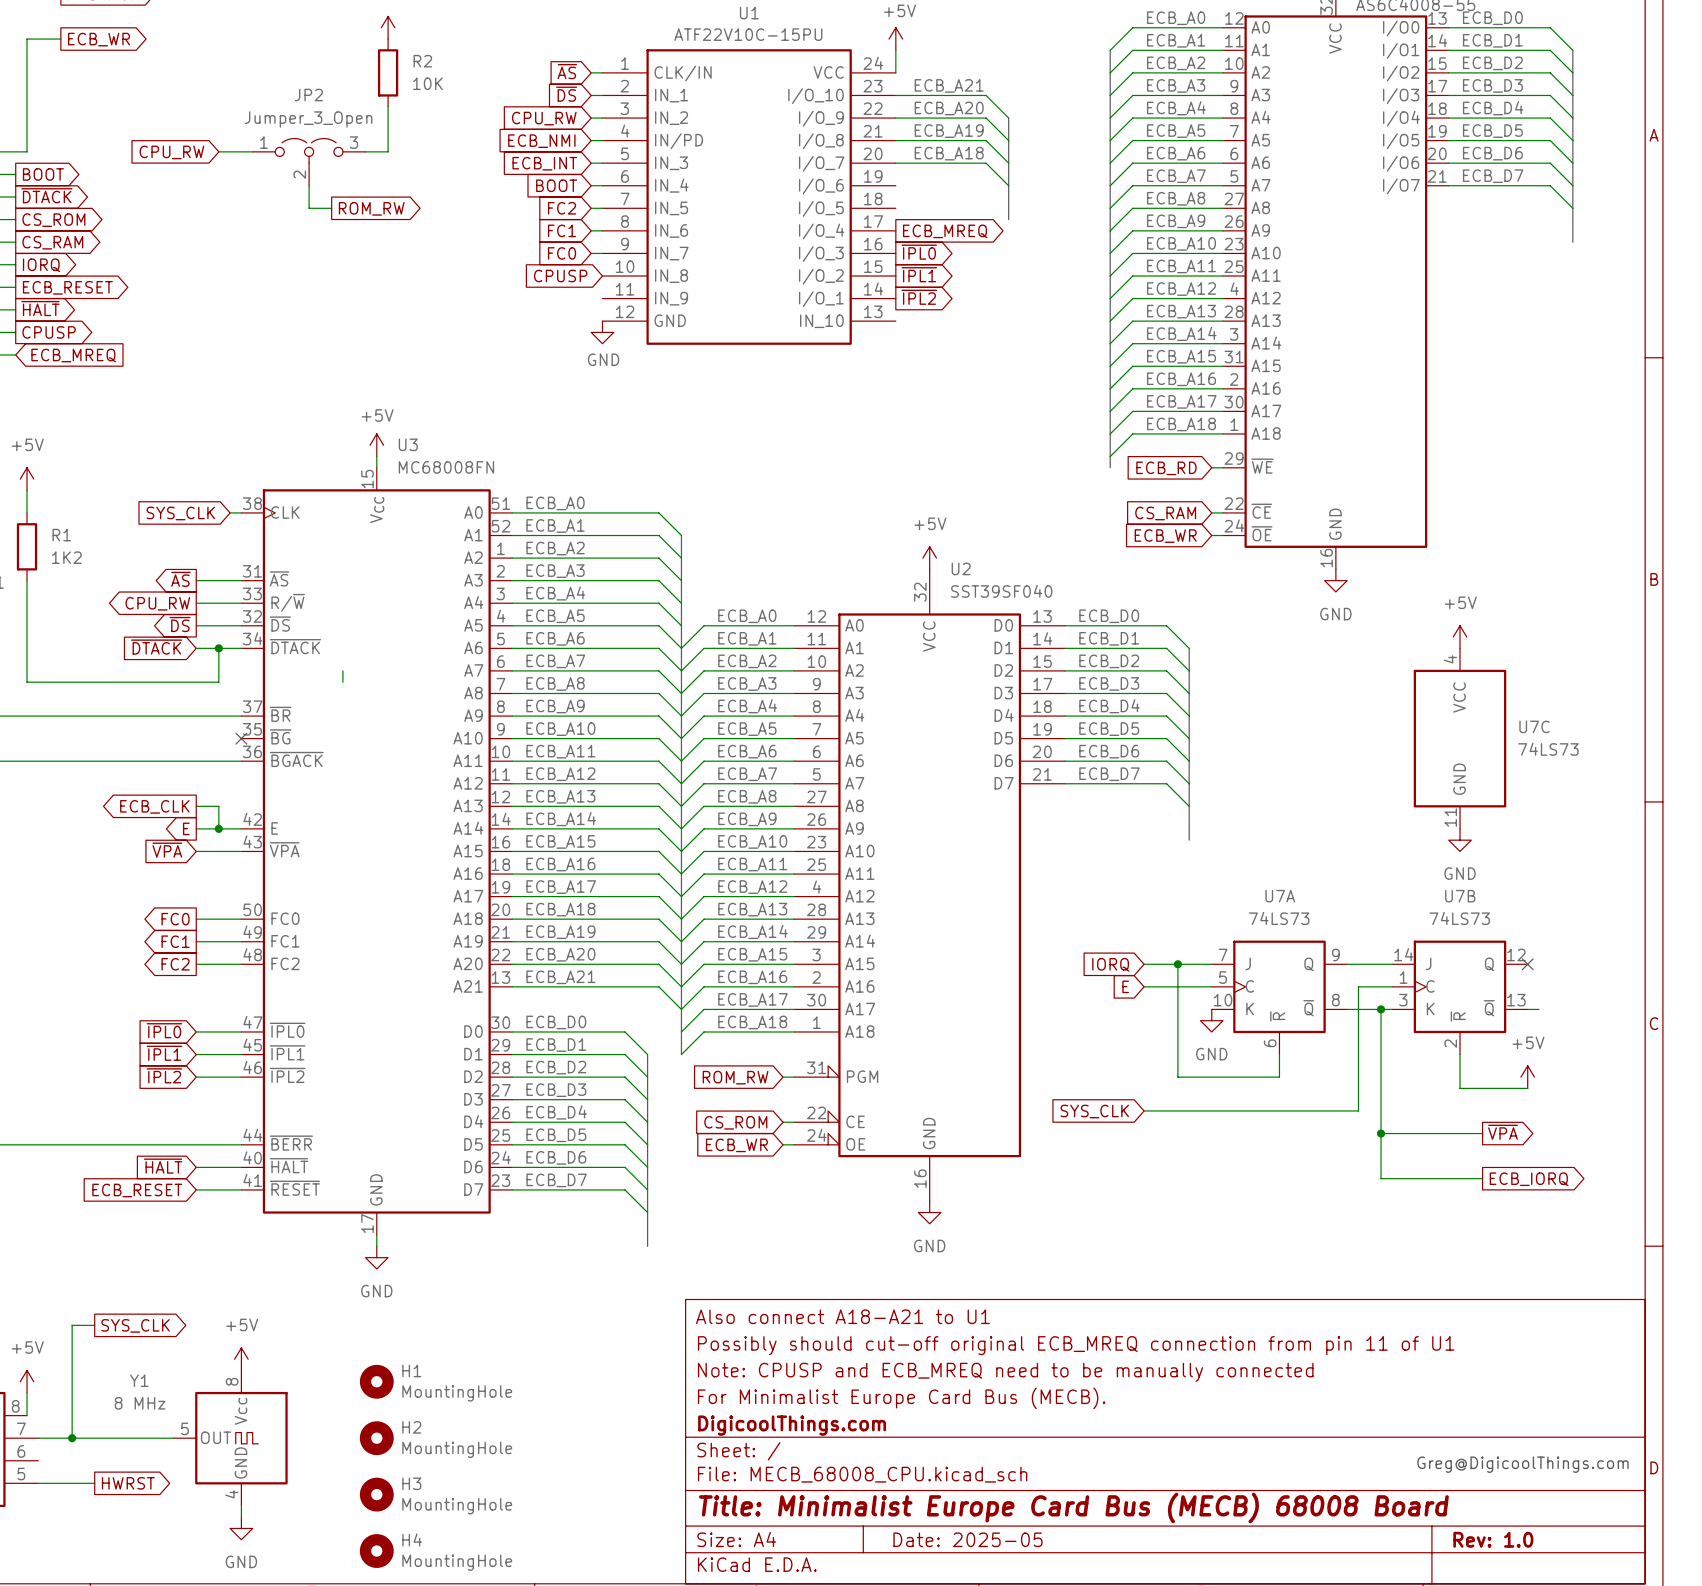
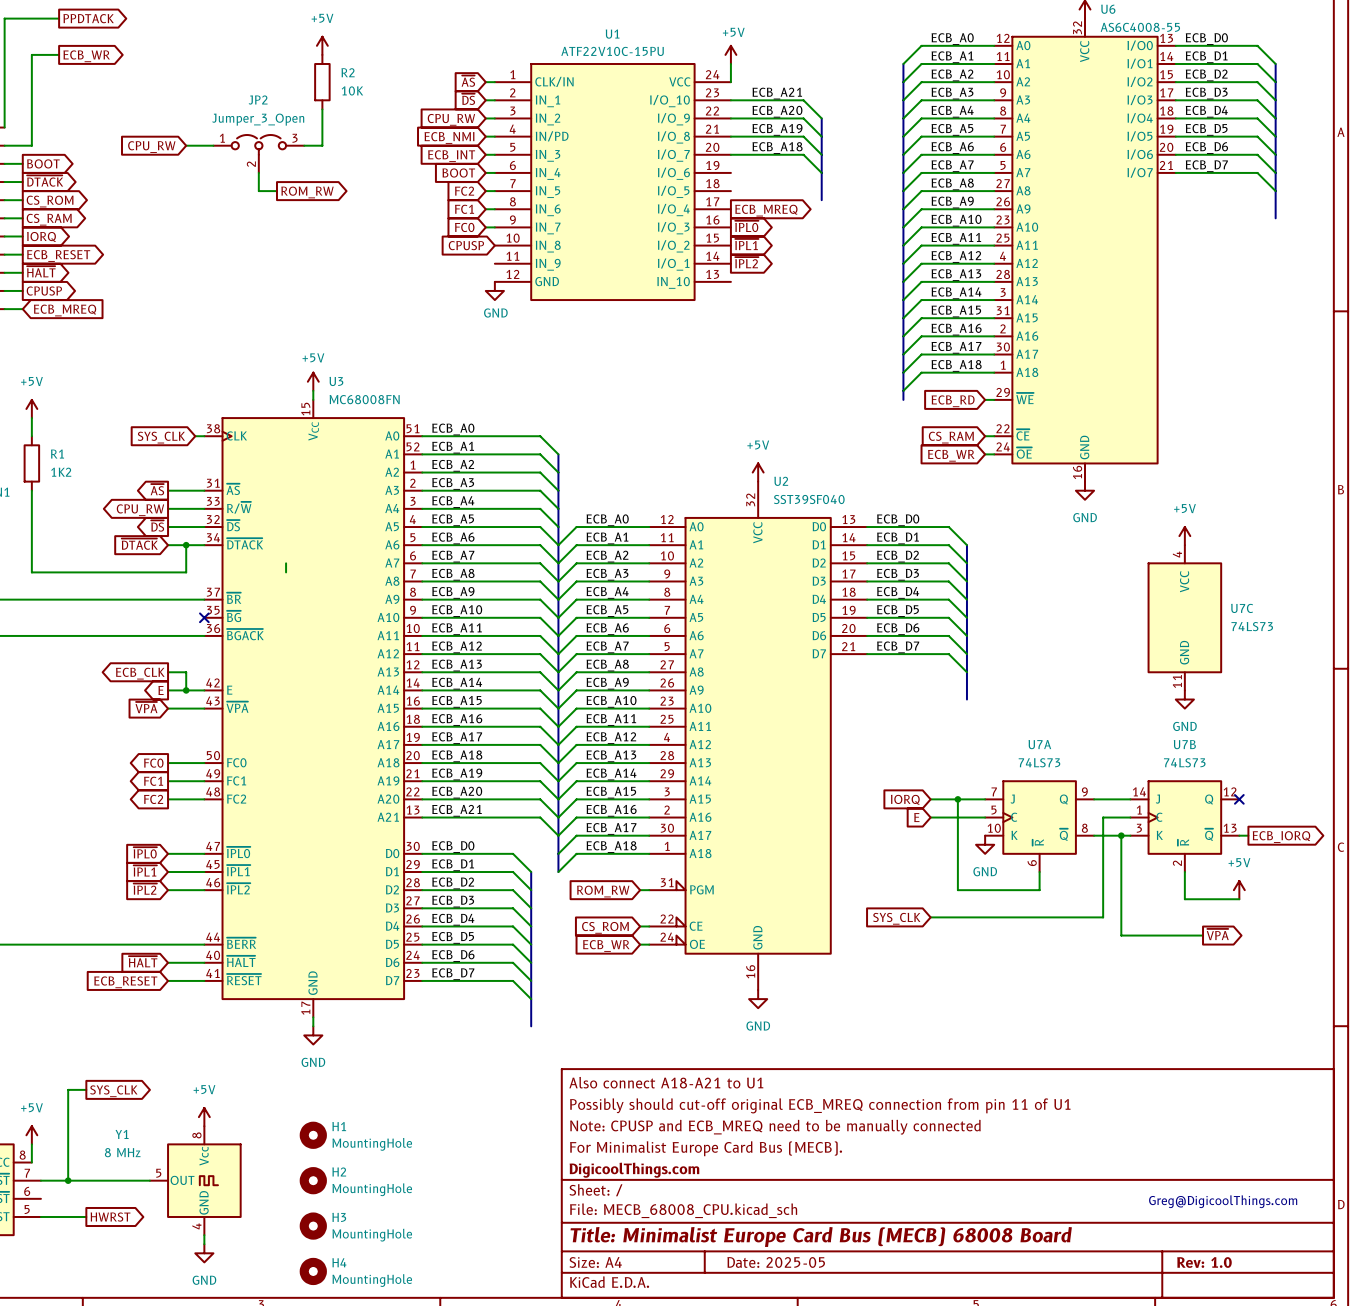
wire: (1381, 1133) (1381, 1178) (1482, 1178) -> none
junction: (1381, 1133) -> none
global label position: ECB_IORQ (1529, 1179) -> ECB_IORQ (1281, 837)

